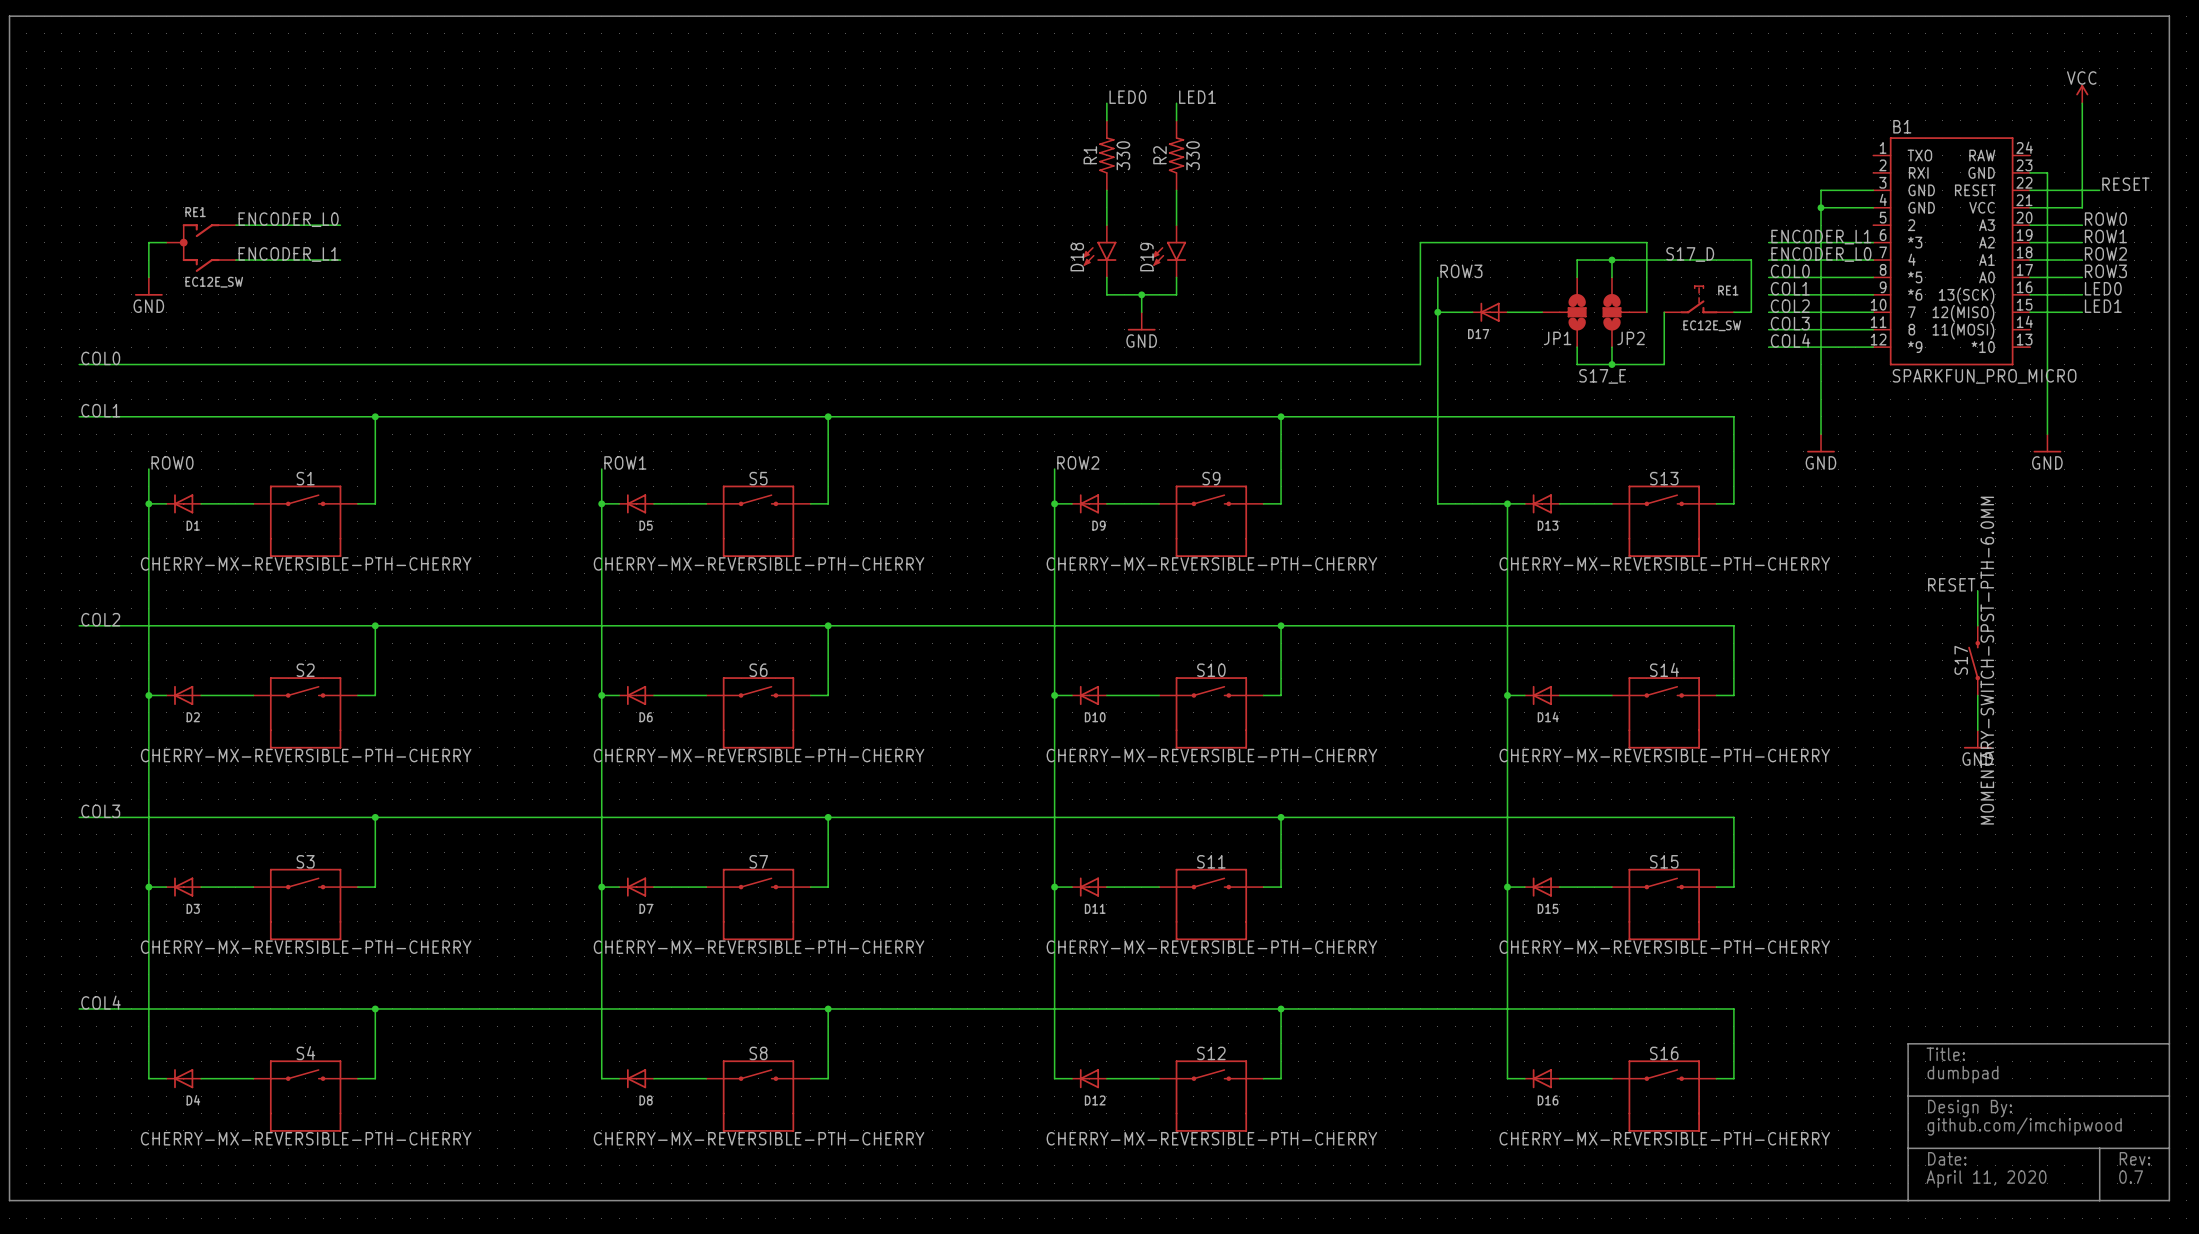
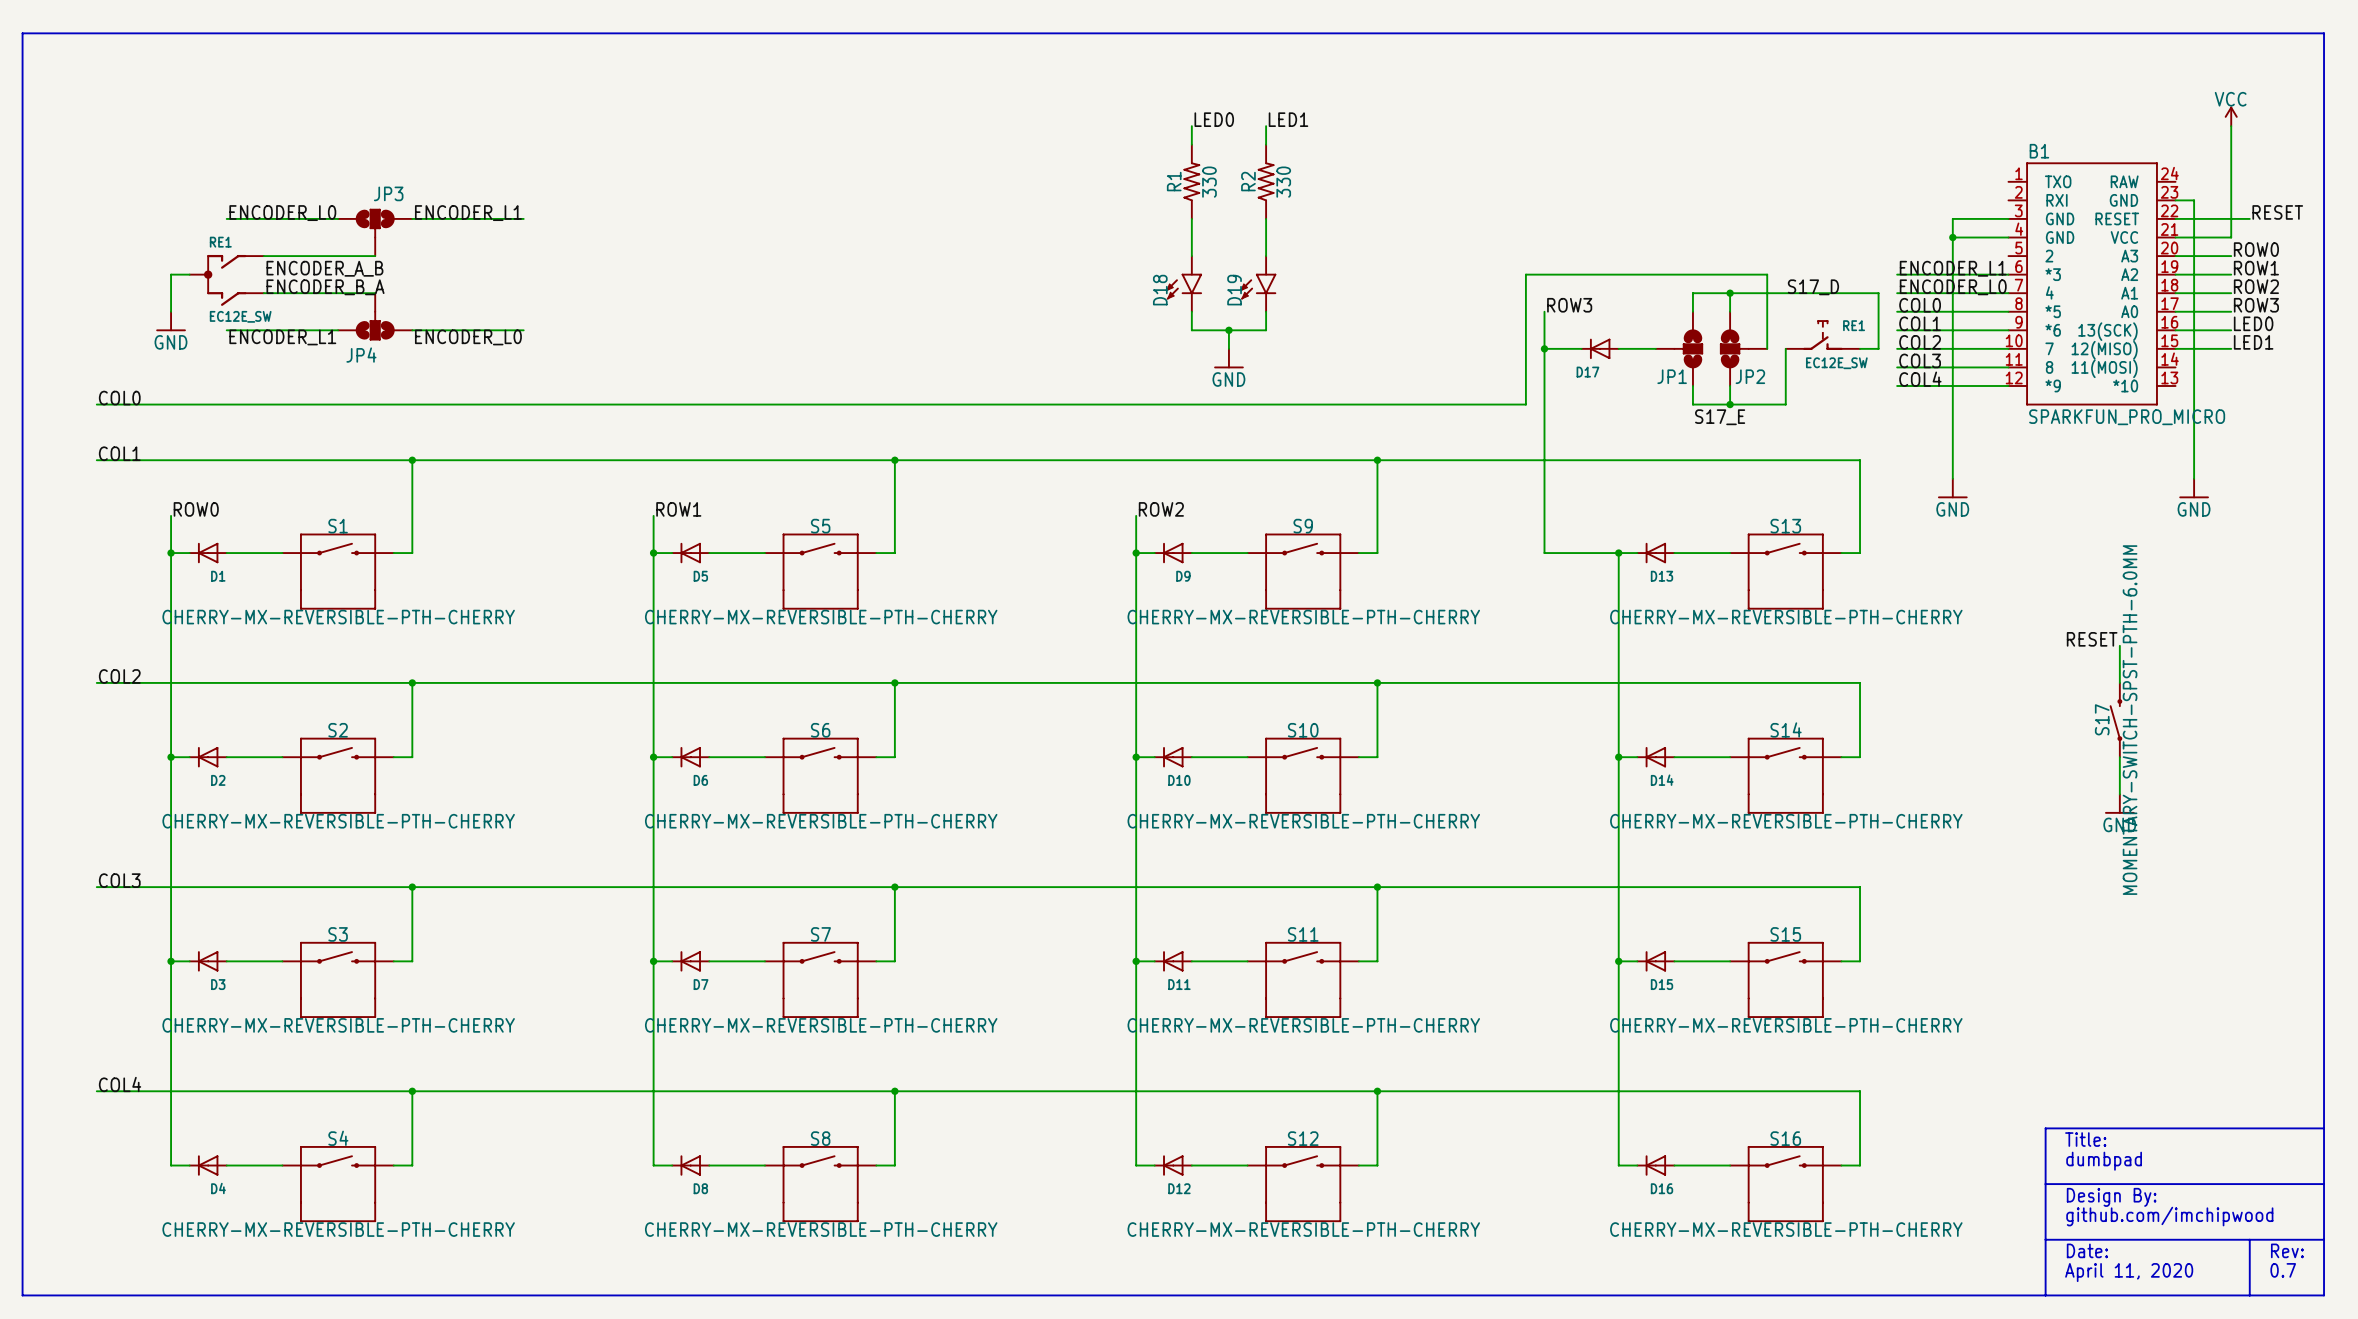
label: none -> ENCODER_L1 (468, 213)
wire: none -> (226, 218) (338, 218)
wire: none -> (412, 218) (523, 218)
JP3: none -> (375, 232)
label position: ENCODER_L0 (288, 219) -> ENCODER_L0 (282, 213)
label: none -> ENCODER_A_B (324, 268)
label: ENCODER_L1 (288, 254) -> ENCODER_B_A (325, 287)
JP4: none -> (375, 316)
wire: none -> (226, 330) (338, 330)
wire: none -> (412, 330) (523, 330)
label: none -> ENCODER_L1 (282, 337)
label: none -> ENCODER_L0 (468, 337)

